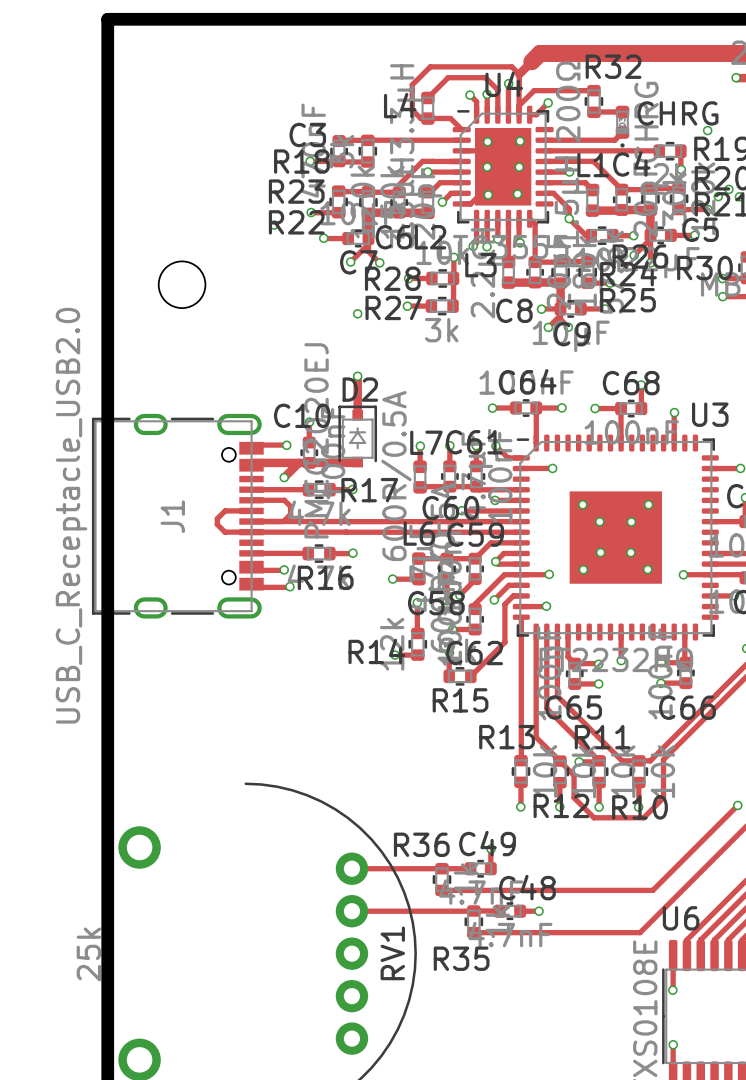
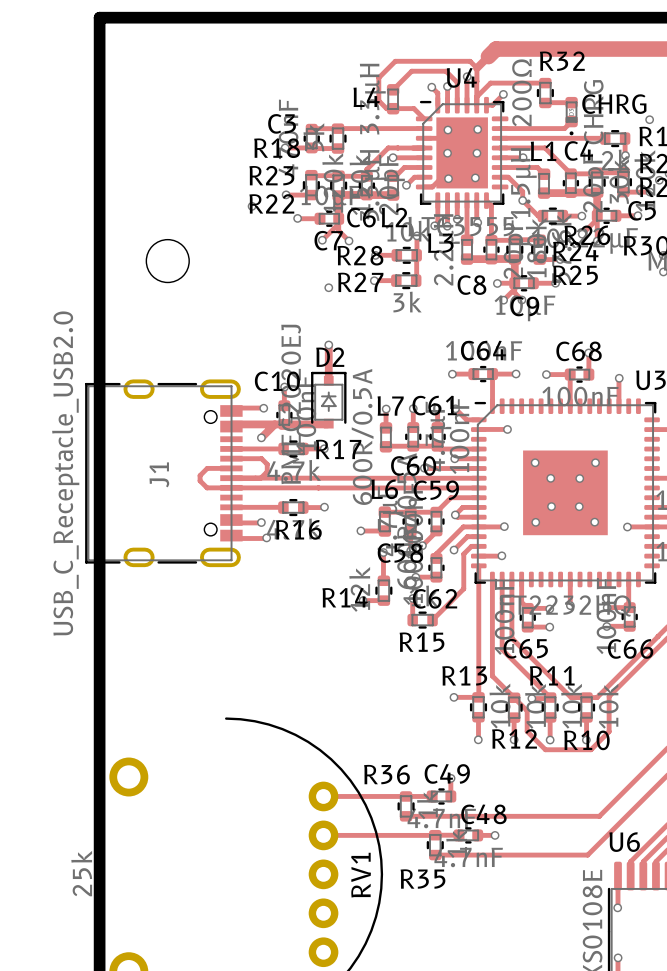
track: none -> (453, 697) (478, 697)
via: none -> (453, 697)

